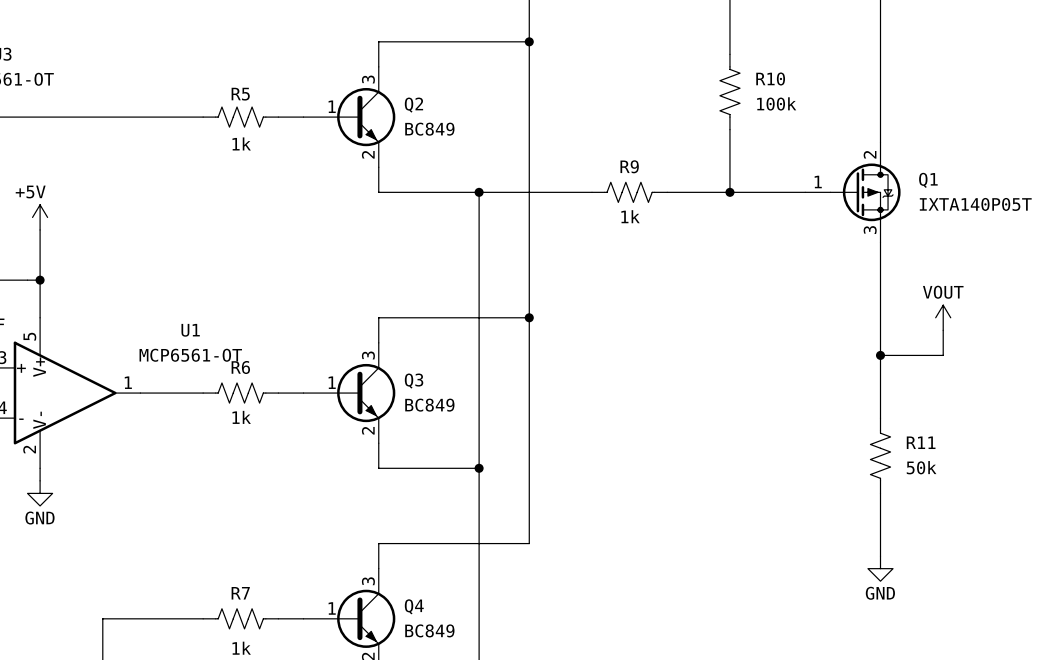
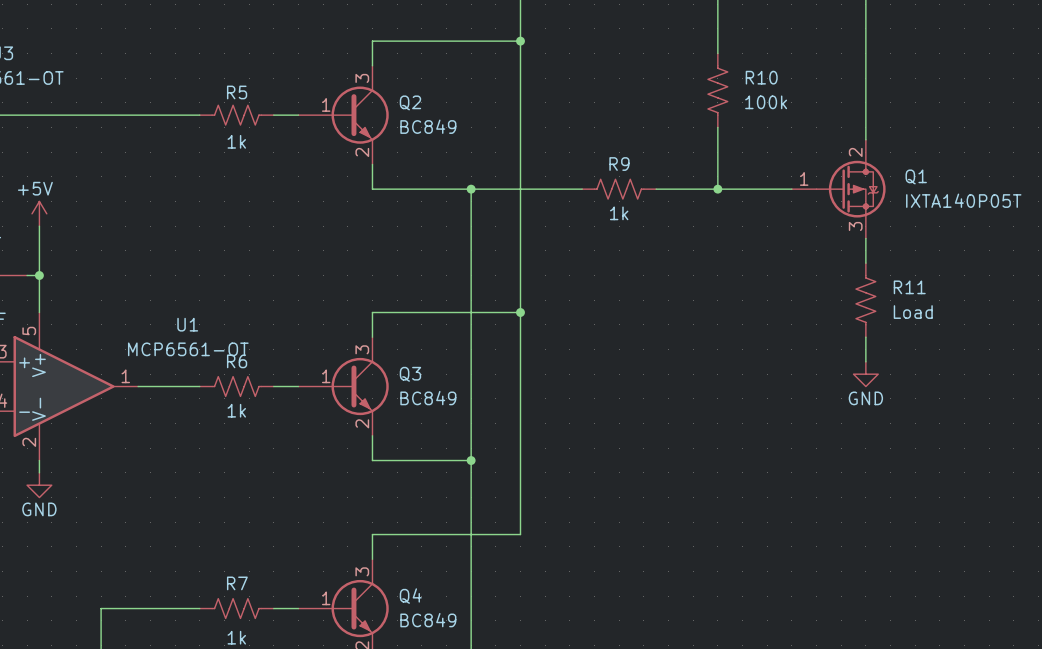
power symbol: VOUT (943, 317) -> none
wire: (943, 330) (943, 355) (880, 355) -> none
junction: (880, 355) -> none
wire: (880, 367) (880, 418) -> none
R11 position: (880, 455) -> (865, 300)
R11 value: 50k (921, 467) -> Load (913, 312)
wire: (880, 493) (880, 556) -> none
power symbol position: GND (880, 568) -> GND (865, 374)

